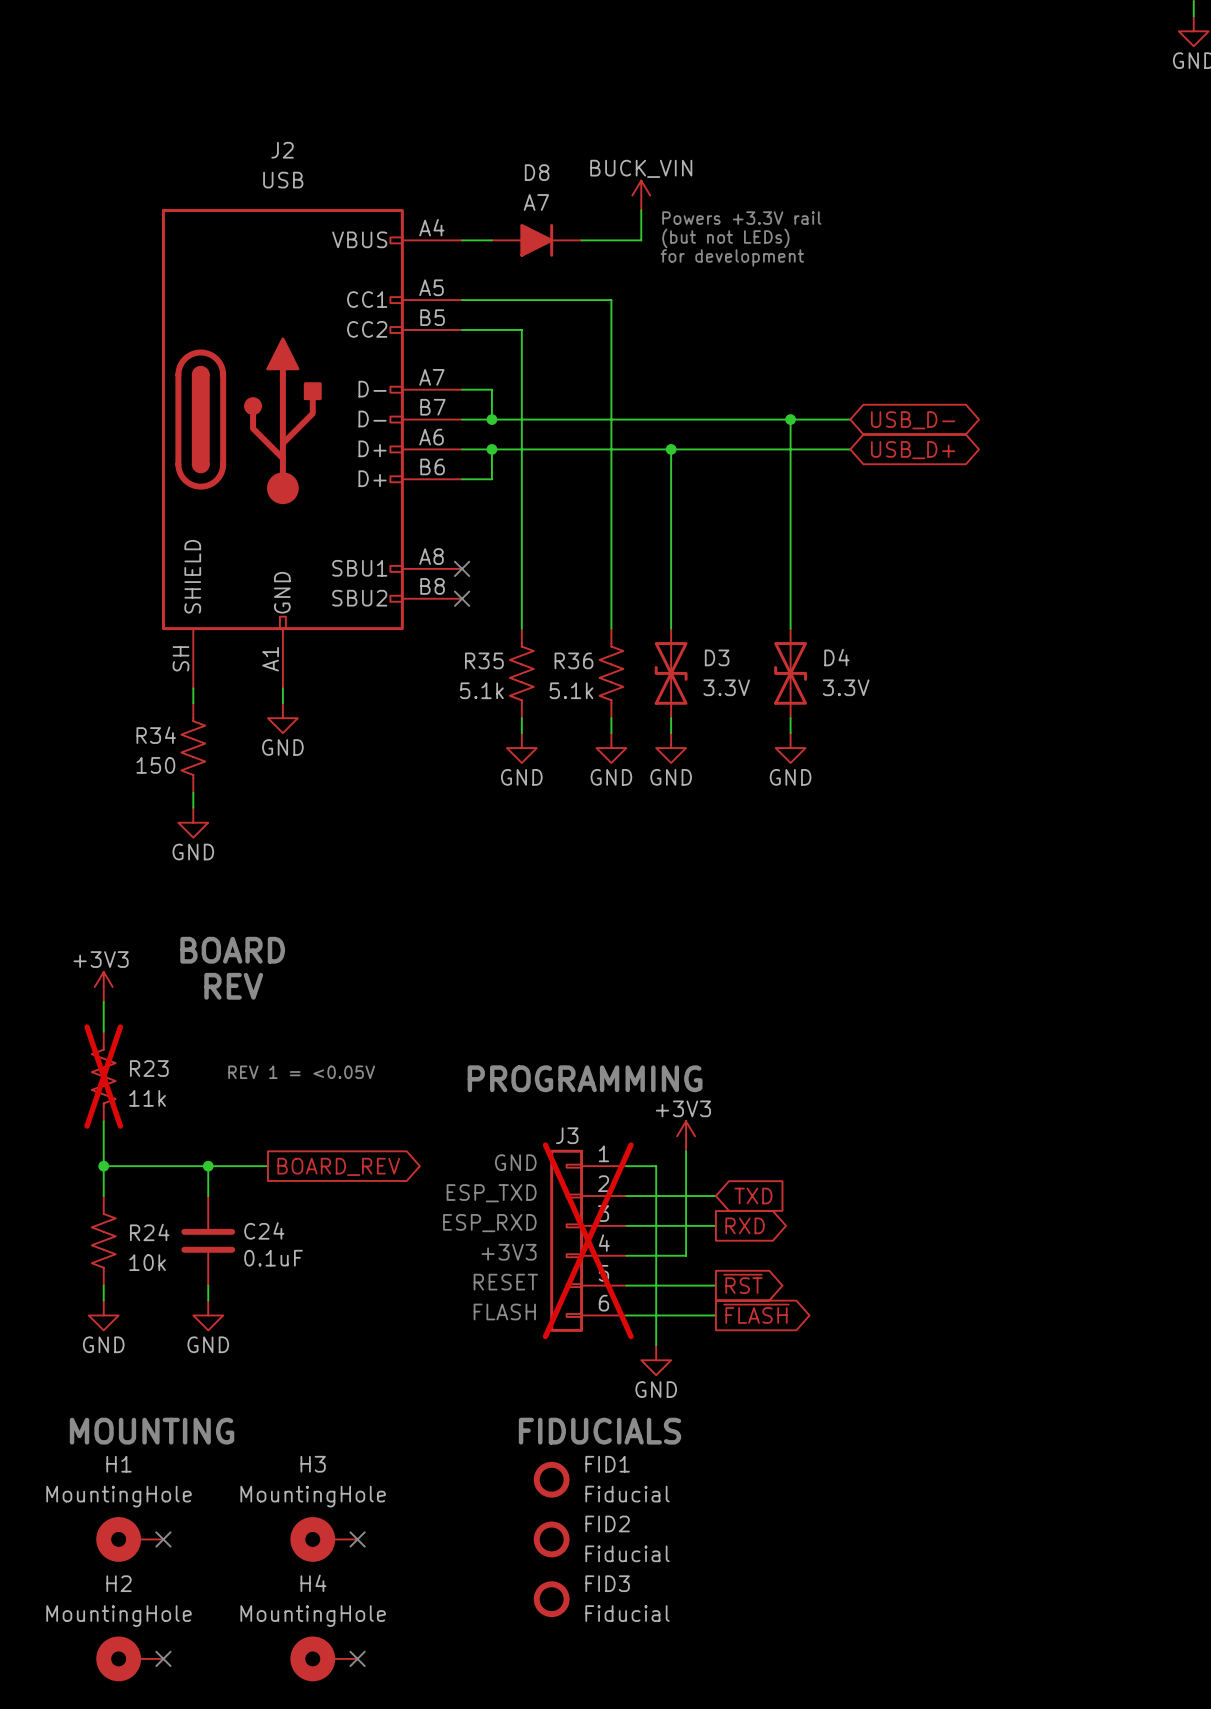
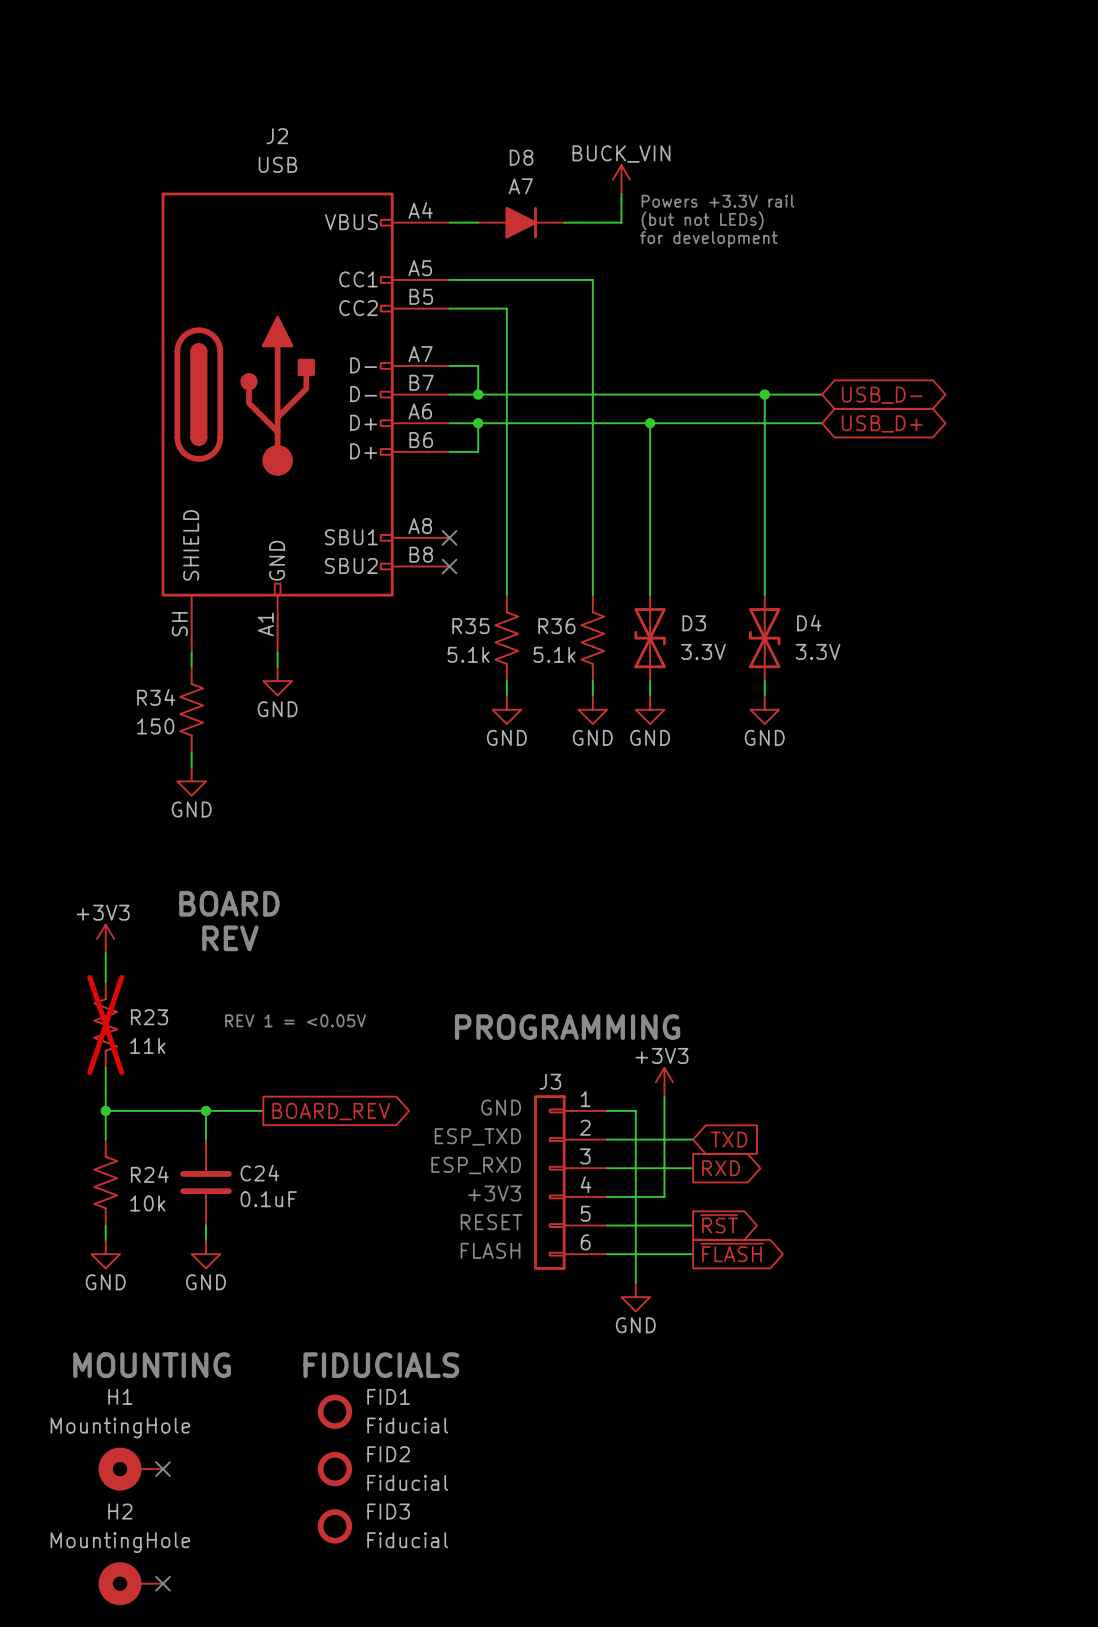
J3 do-not-place cross: (588, 1240) -> none
text position: FIDUCIALS (599, 1431) -> FIDUCIALS (381, 1365)
FID1 position: (551, 1479) -> (334, 1411)
H3: MountingHole (323, 1539) -> none
no-connect mark: (357, 1539) -> none
FID2 position: (551, 1539) -> (334, 1469)
FID3 position: (551, 1599) -> (334, 1526)
H4: MountingHole (323, 1658) -> none
no-connect mark: (357, 1658) -> none

